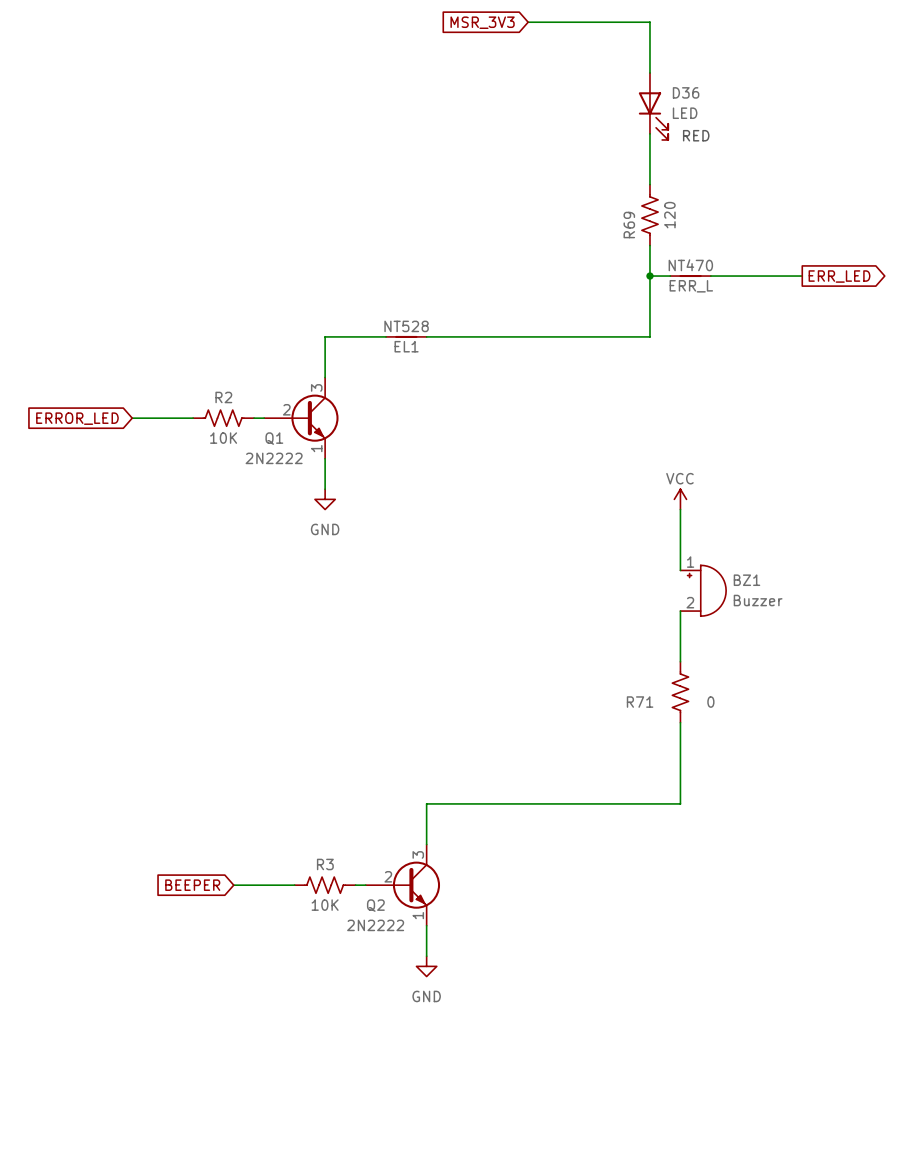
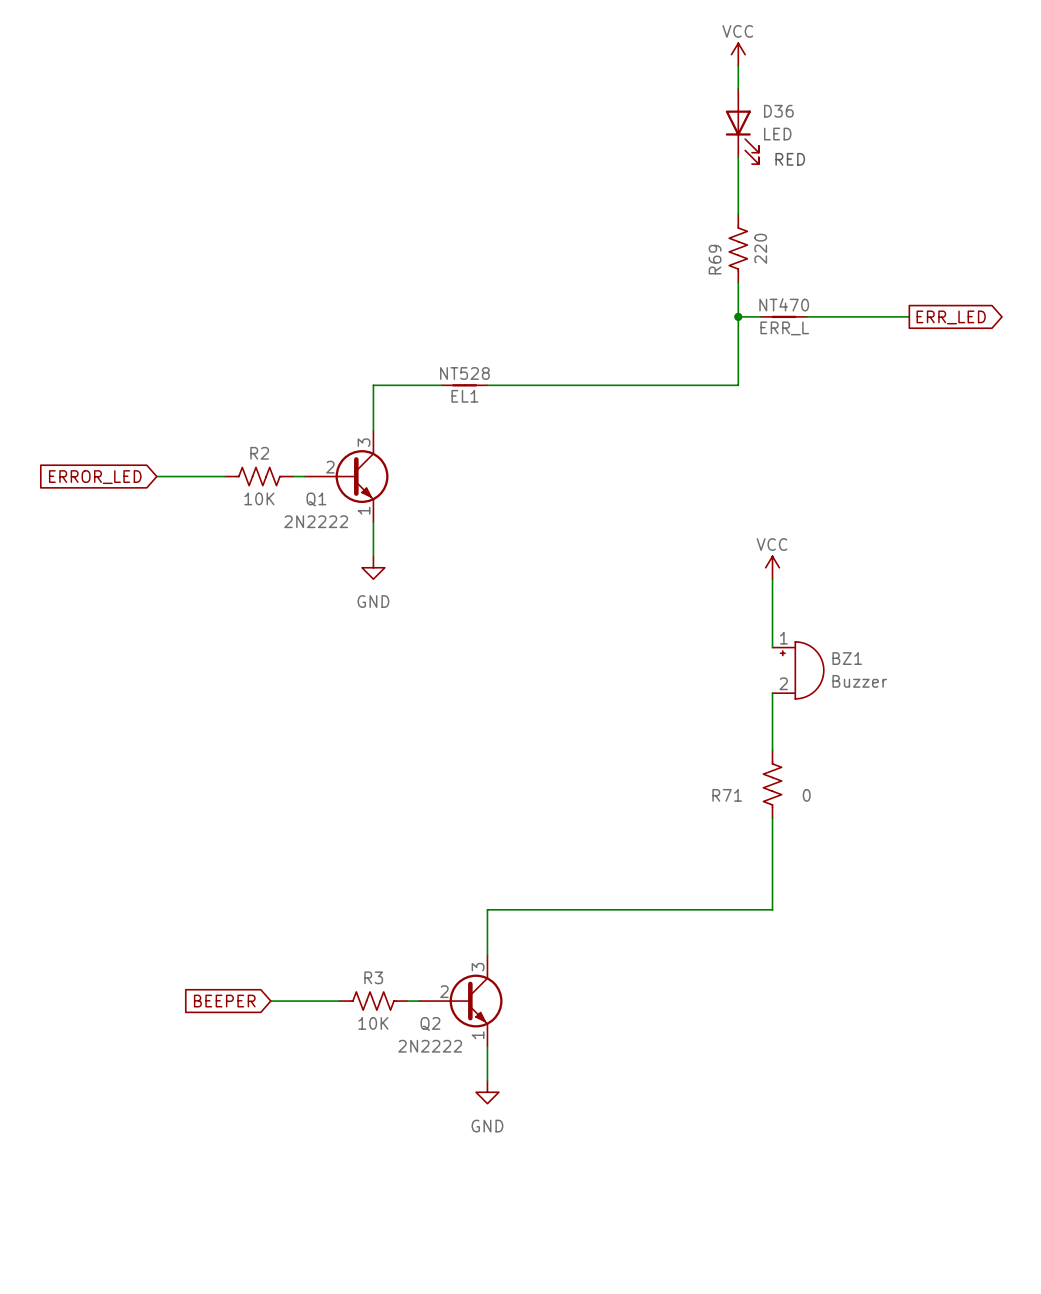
global label: MSR_3V3 (482, 22) -> none
wire: (528, 22) (649, 22) (649, 52) -> none
power symbol: none -> VCC (738, 54)
R69 value: 120 (669, 215) -> 220 (760, 248)

